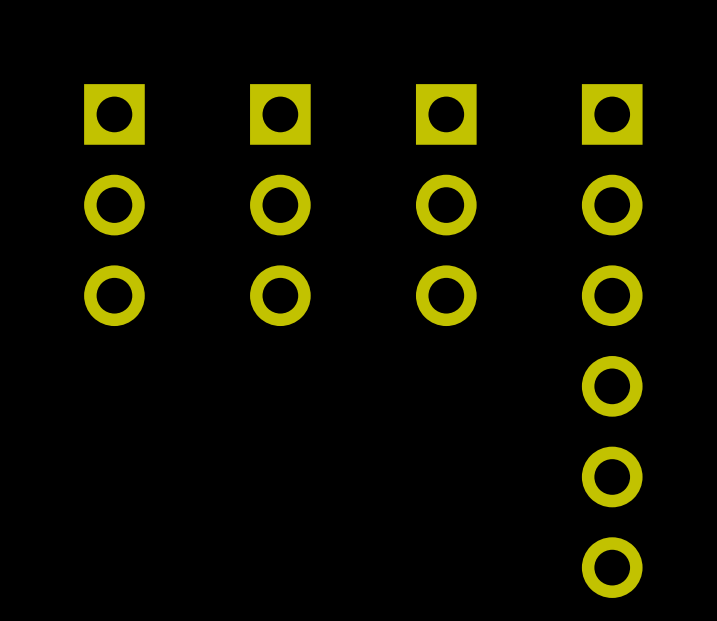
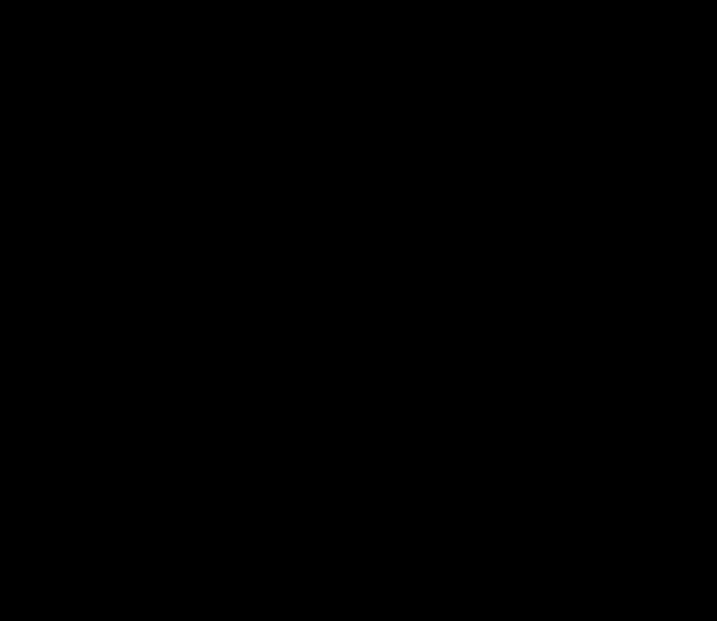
part: (114, 205) -> none
part: (280, 205) -> none
part: (446, 205) -> none
part: (612, 341) -> none

